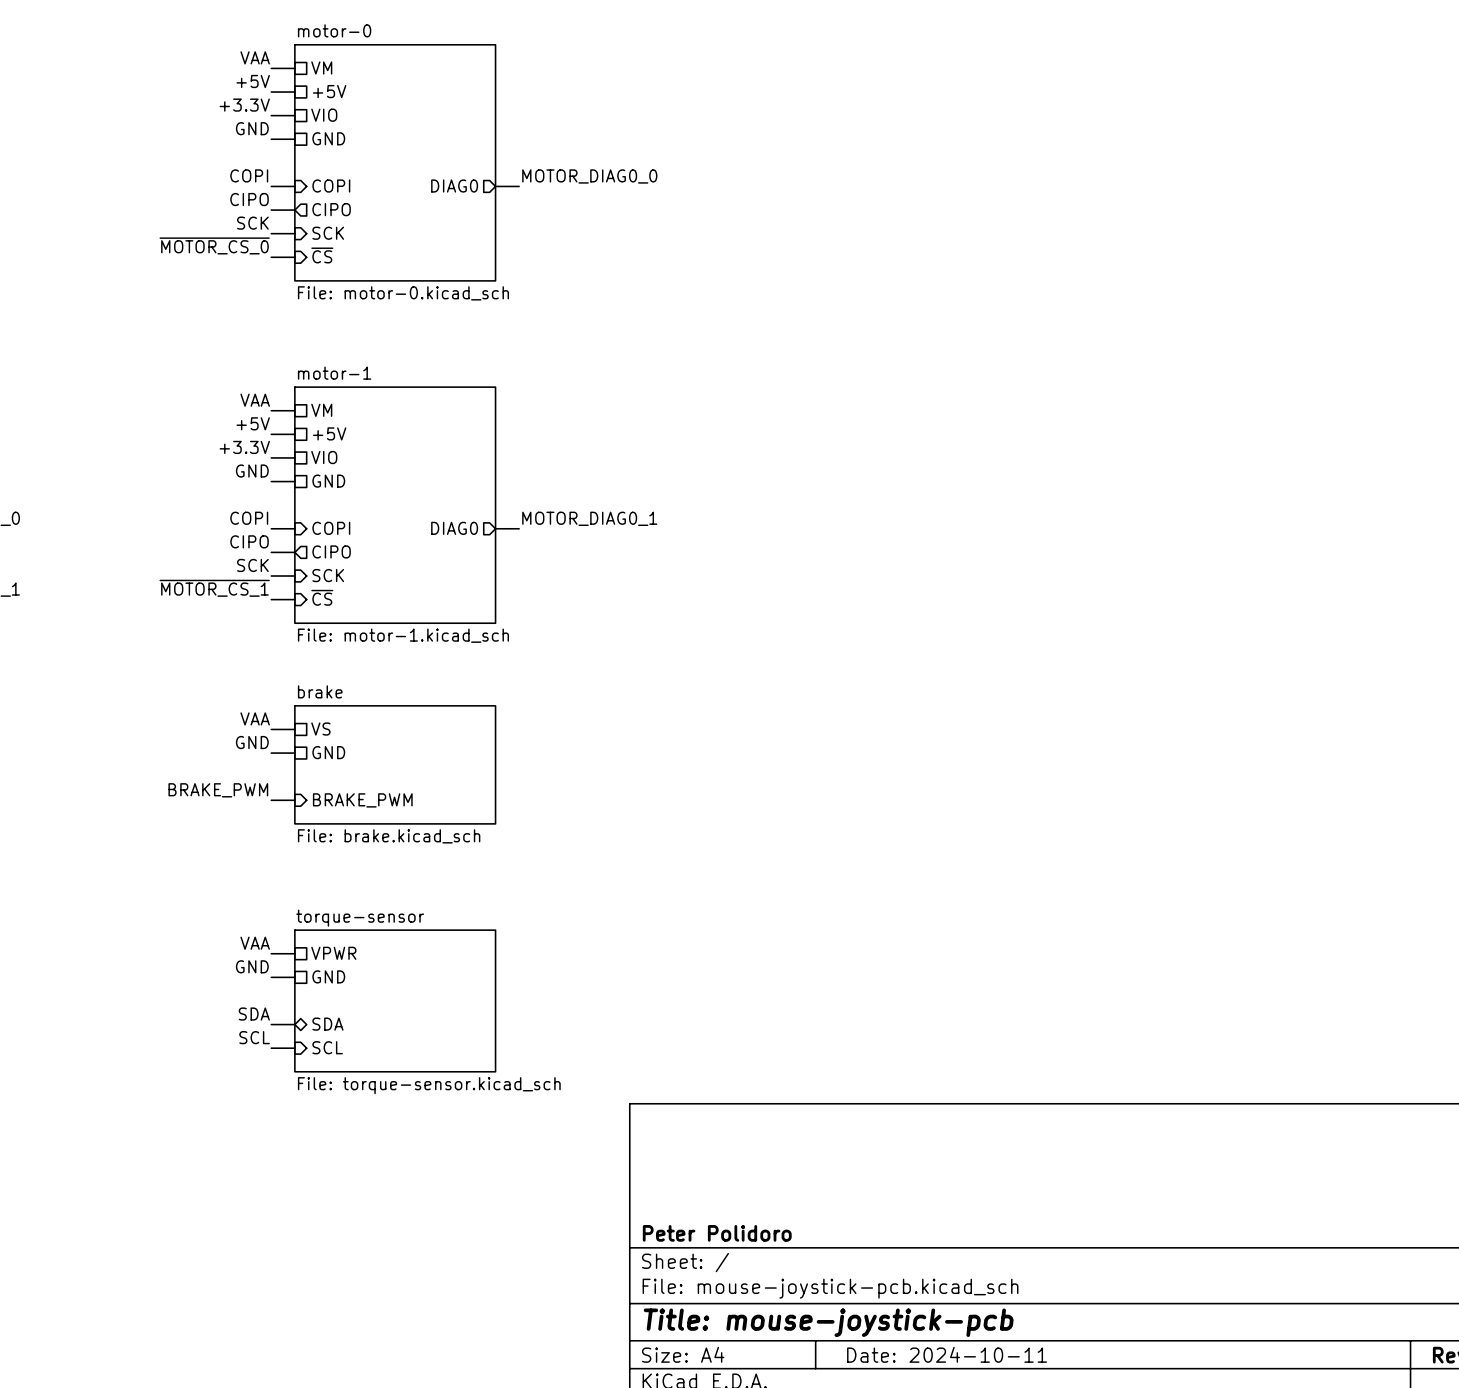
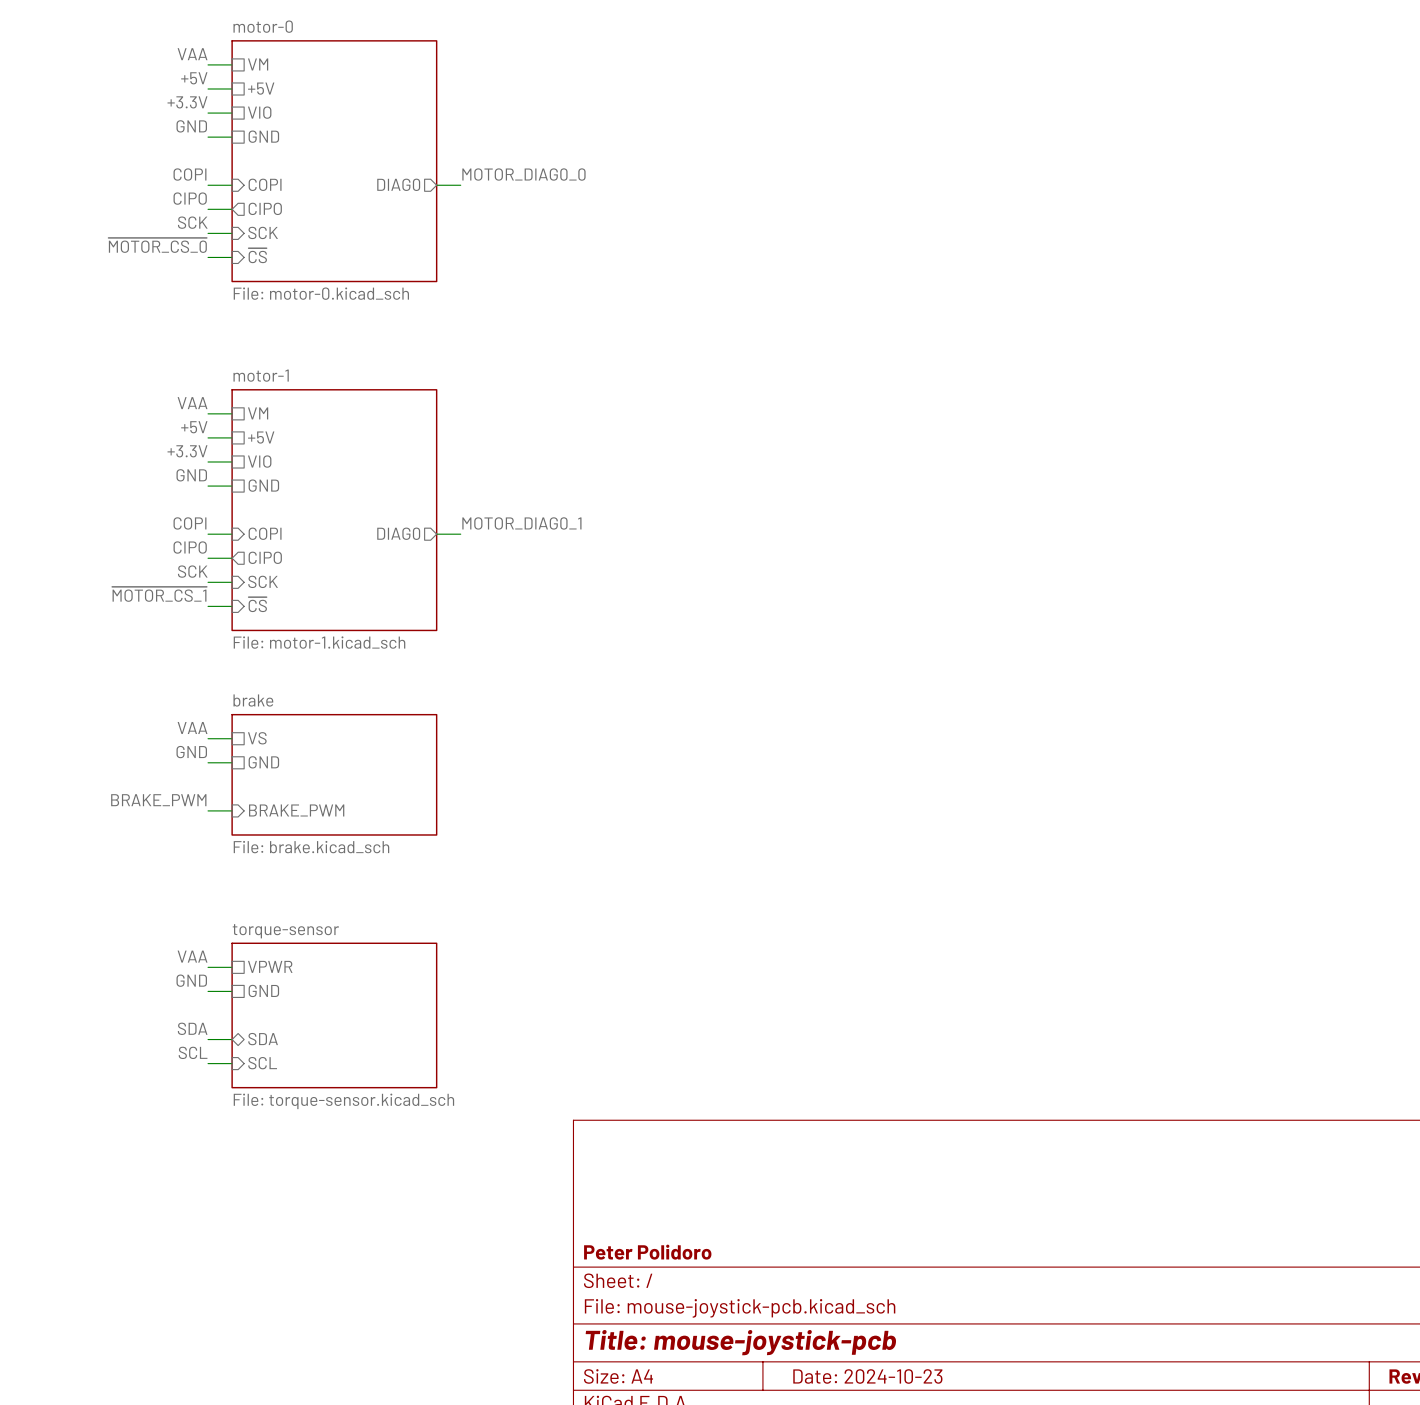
title block: Date: 2024-10-11 (947, 1354) -> Date: 2024-10-23 (867, 1376)

